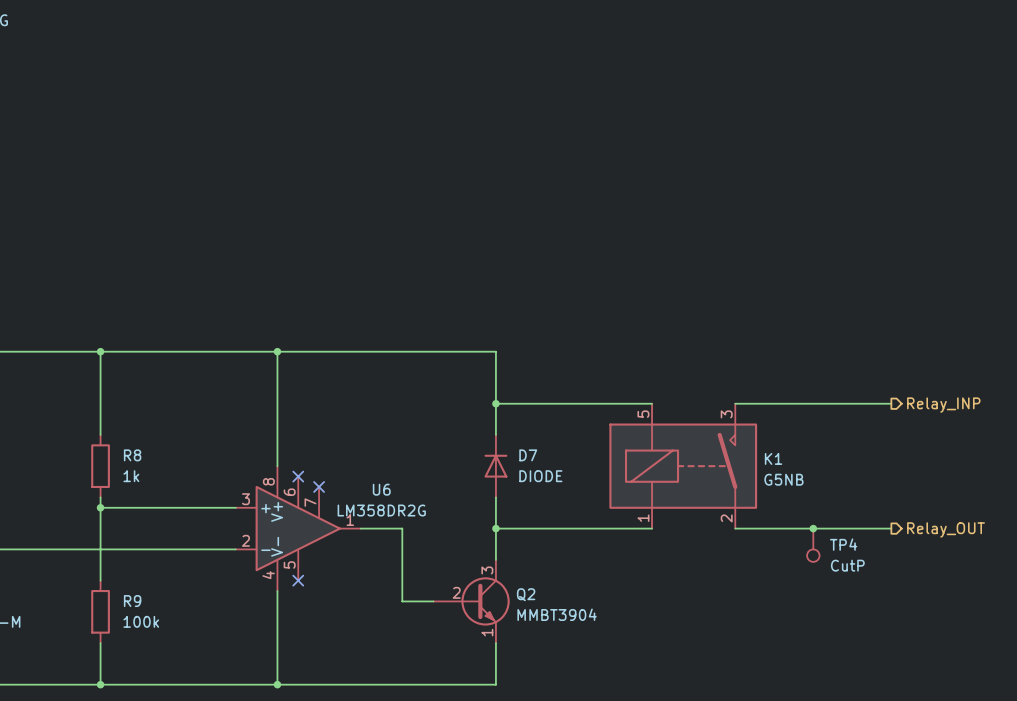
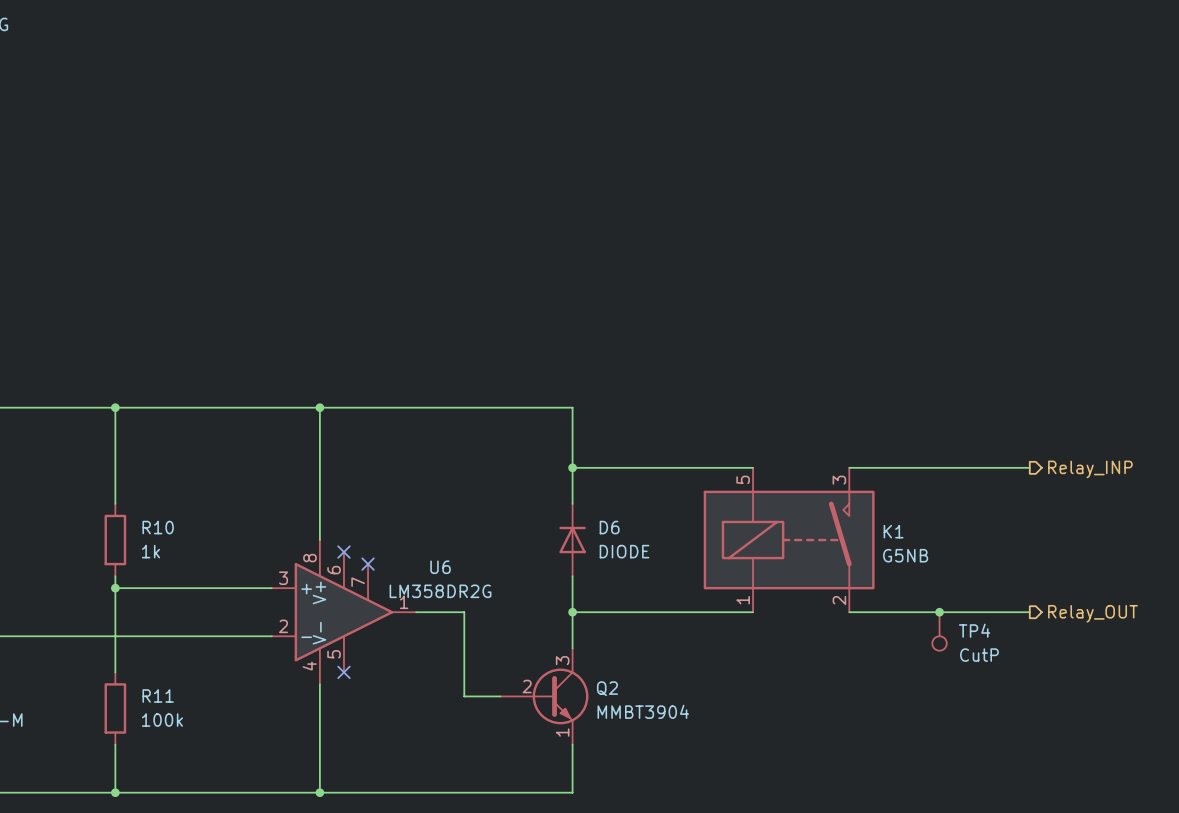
R8 name: R8 (132, 455) -> R10 (158, 527)
D7 name: D7 (528, 455) -> D6 (609, 527)
R9 name: R9 (132, 601) -> R11 (158, 695)

